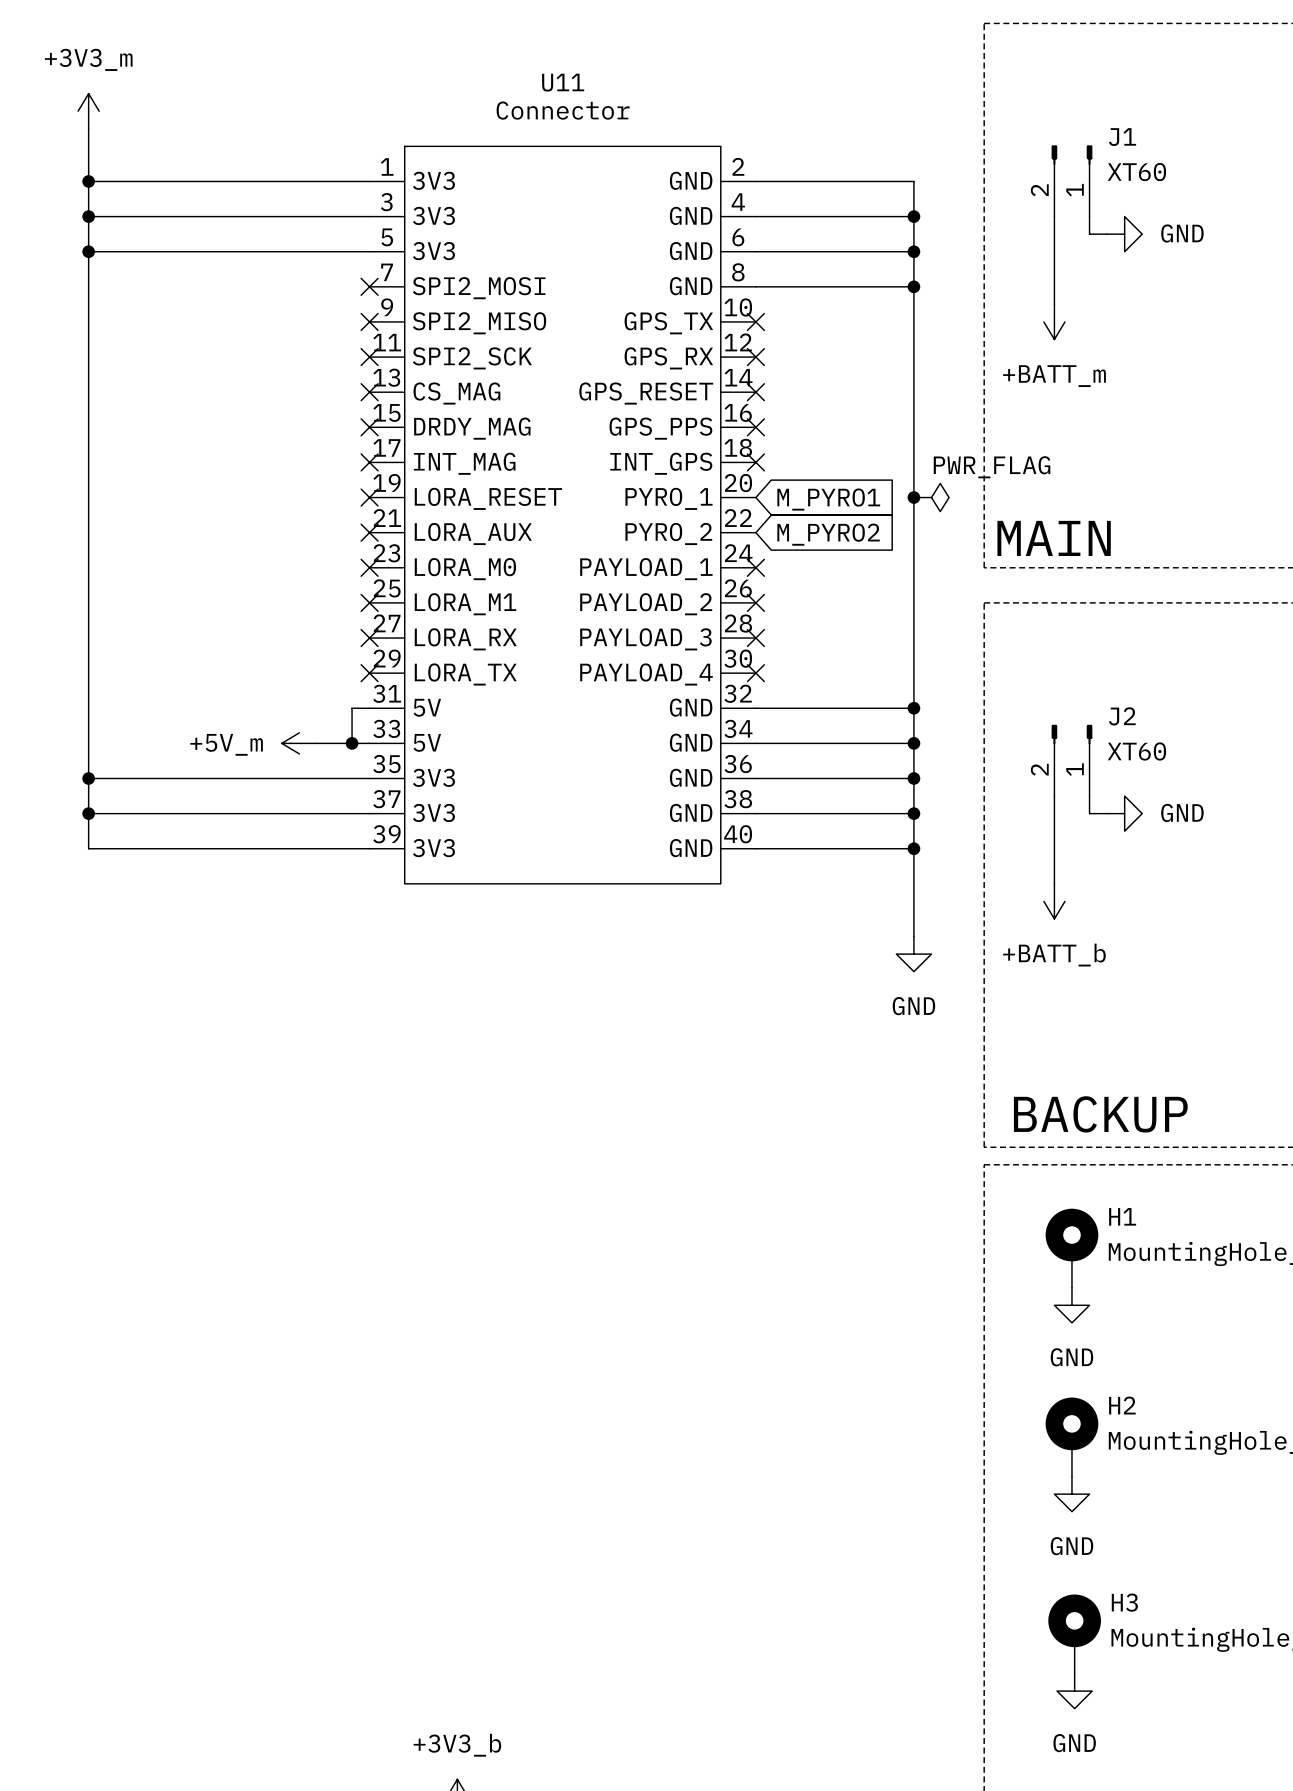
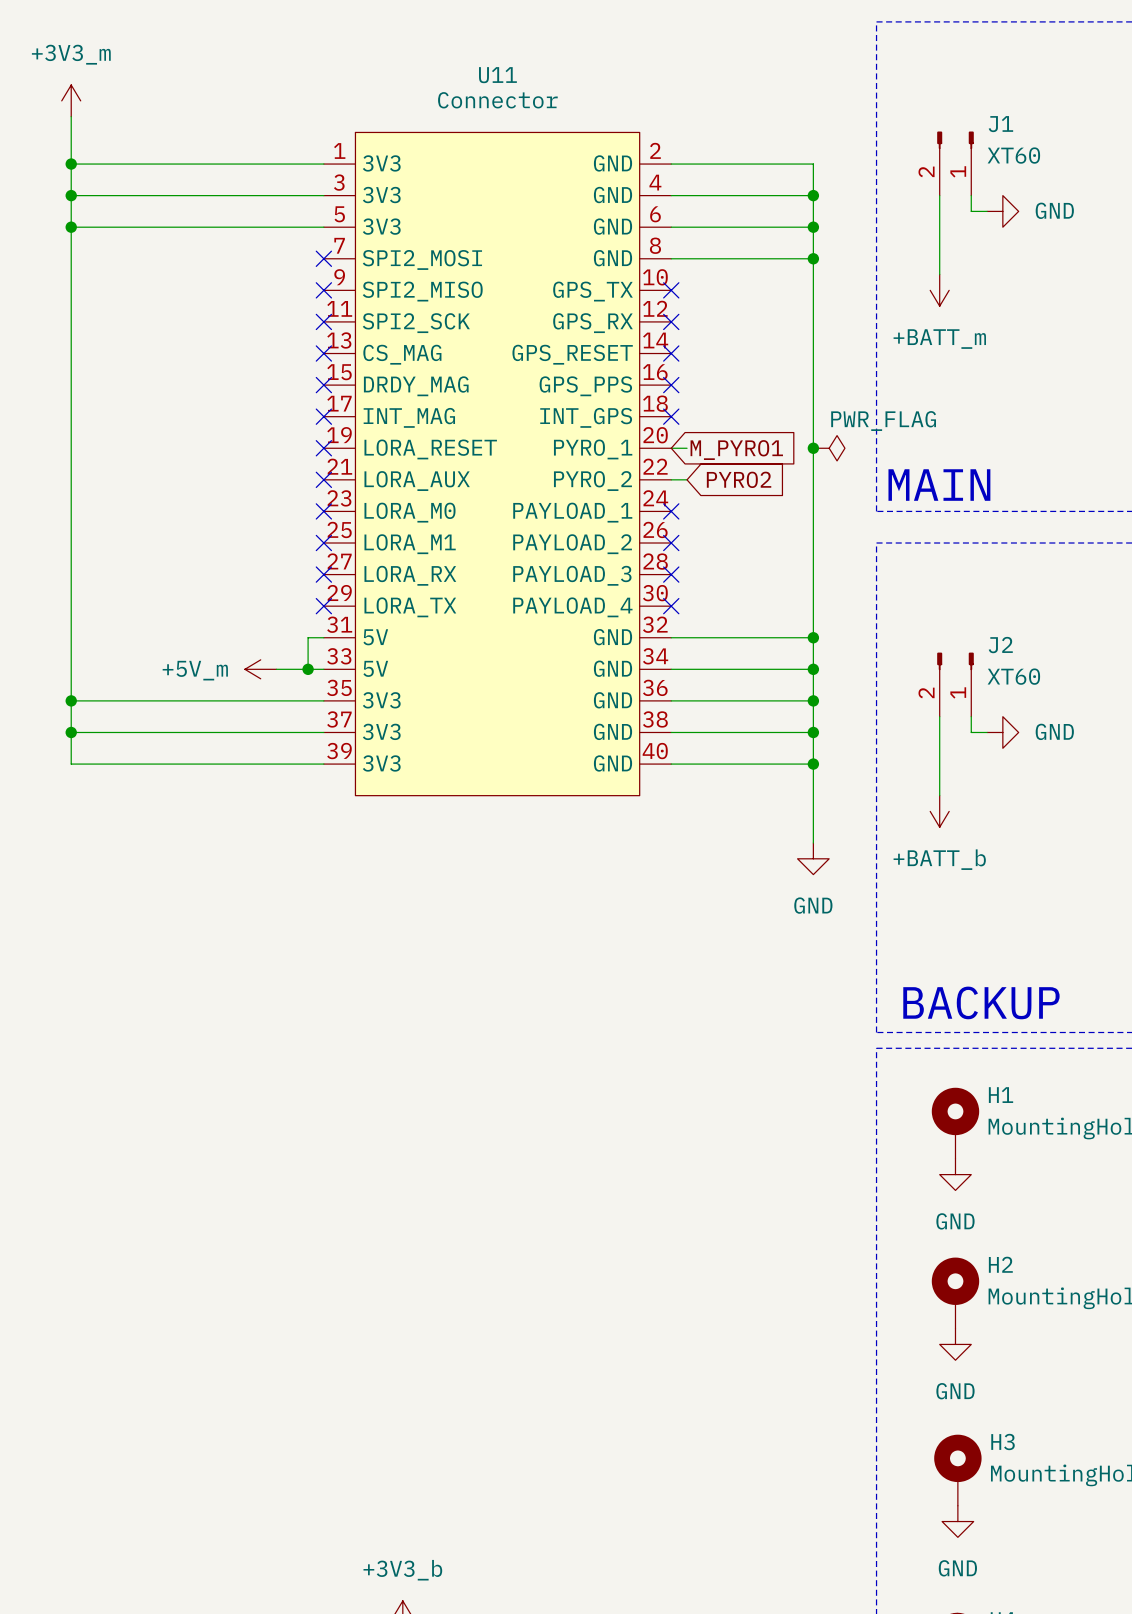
wire: none -> (671, 448) (687, 448)
wire: none -> (671, 479) (687, 479)
global label: M_PYRO2 (828, 534) -> PYRO2 (739, 479)

